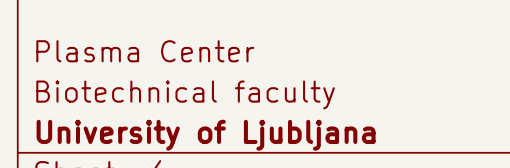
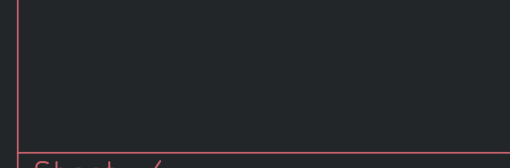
title block: Plasma Center (145, 51) -> none
title block: Biotechnical faculty (185, 94) -> none
title block: University of Ljubljana (206, 135) -> none

